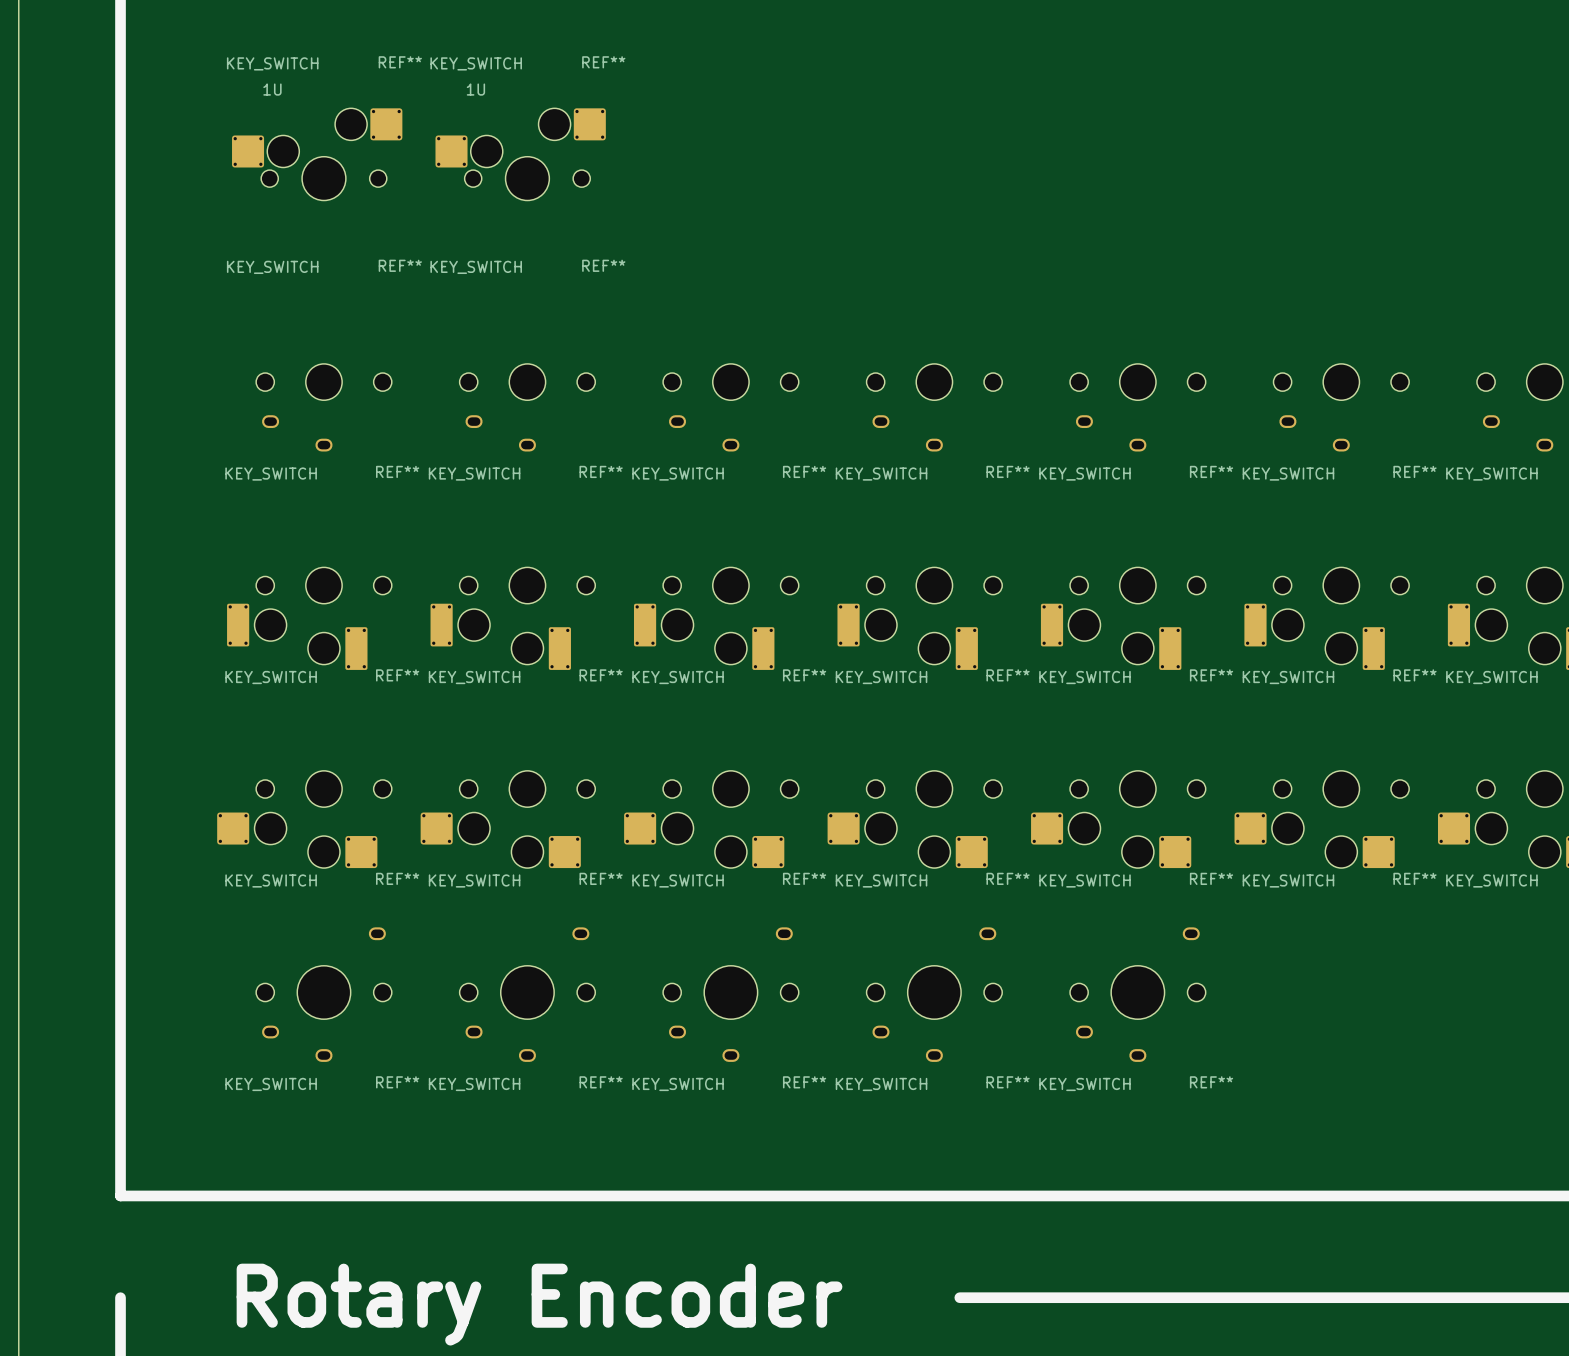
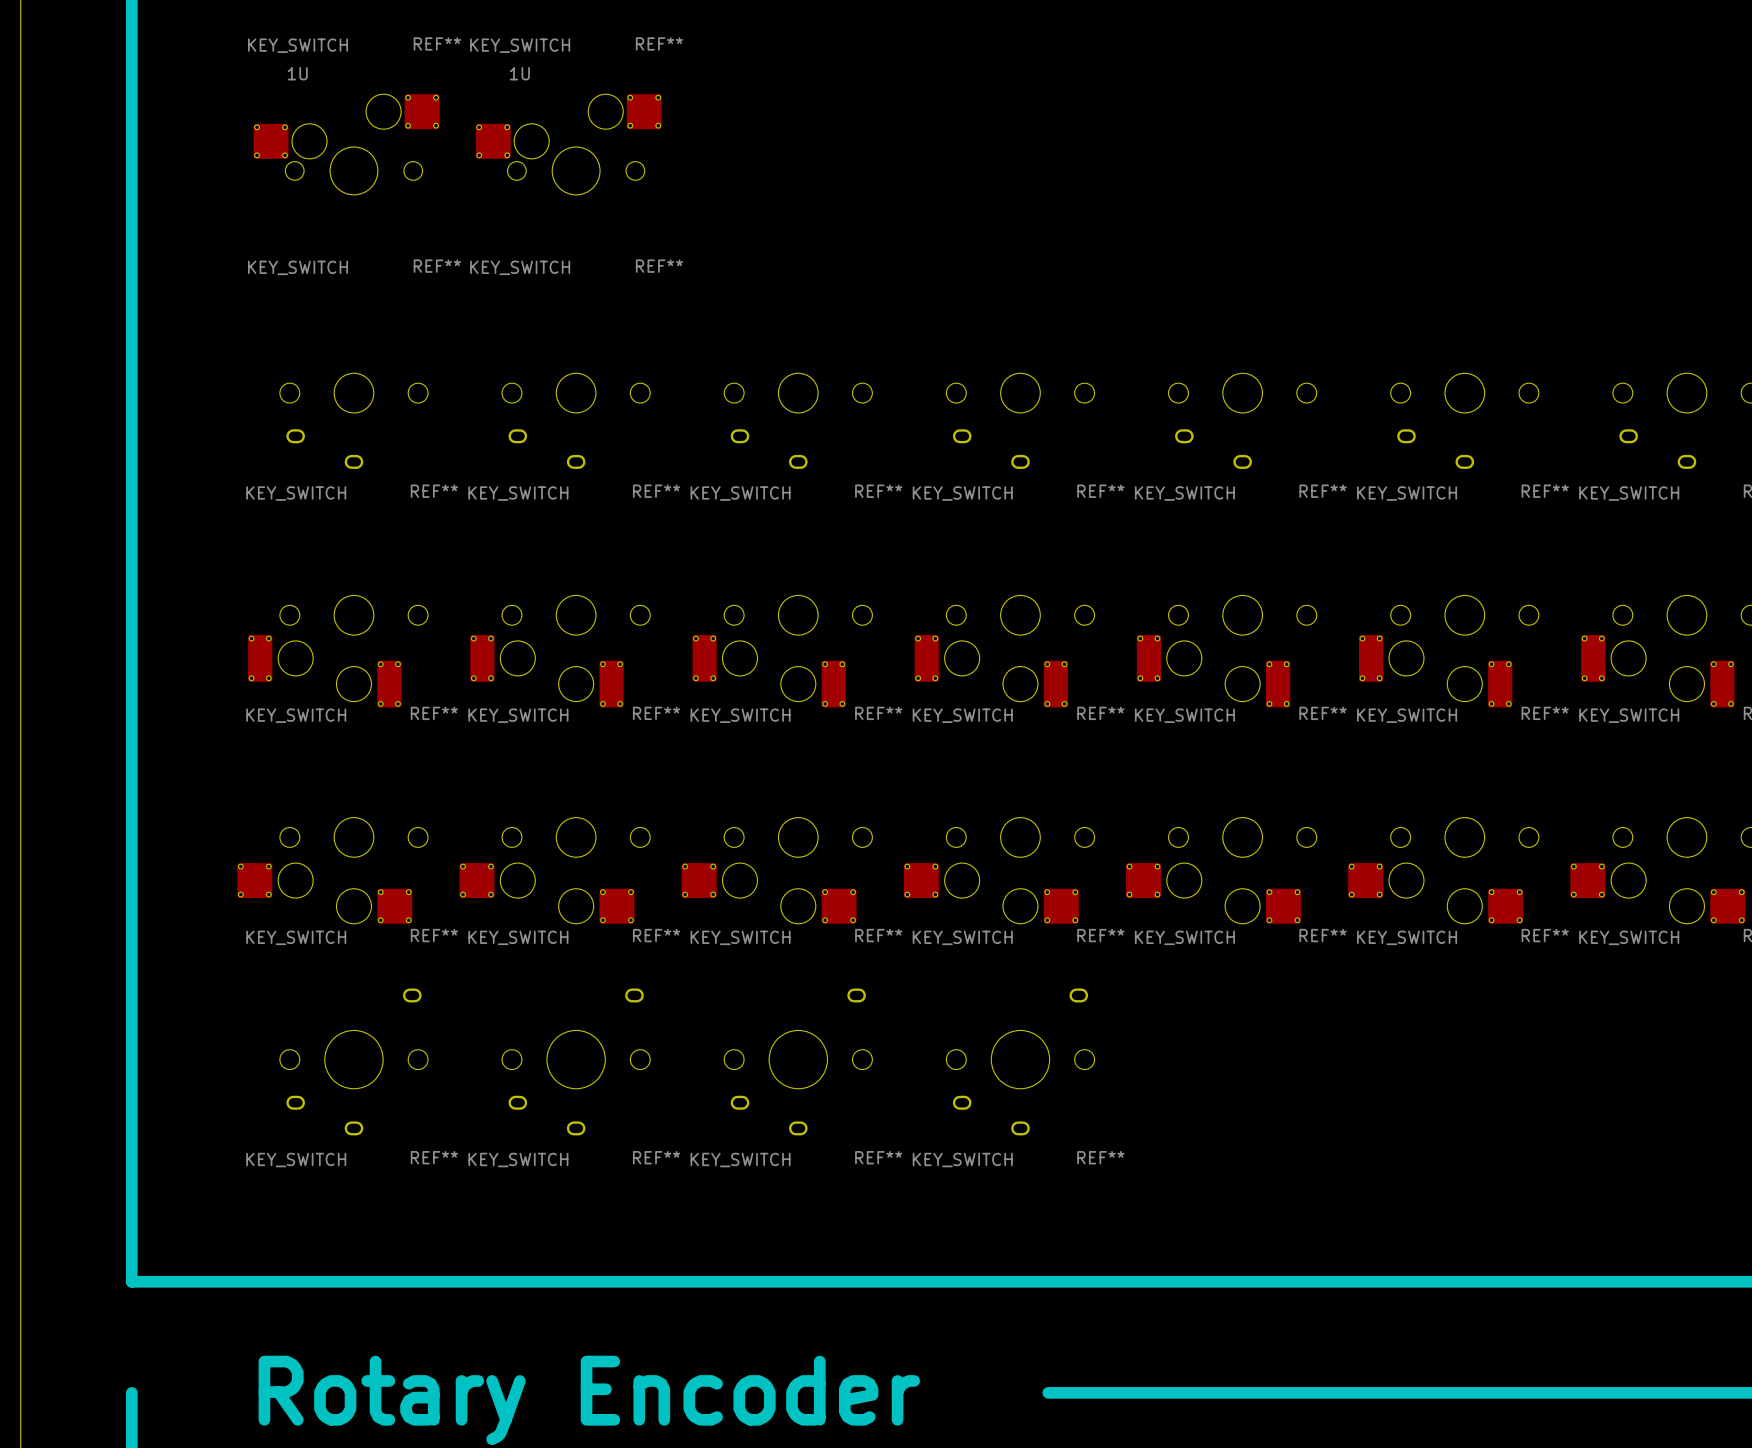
REF**: KEY_SWITCH (1137, 994) -> none

